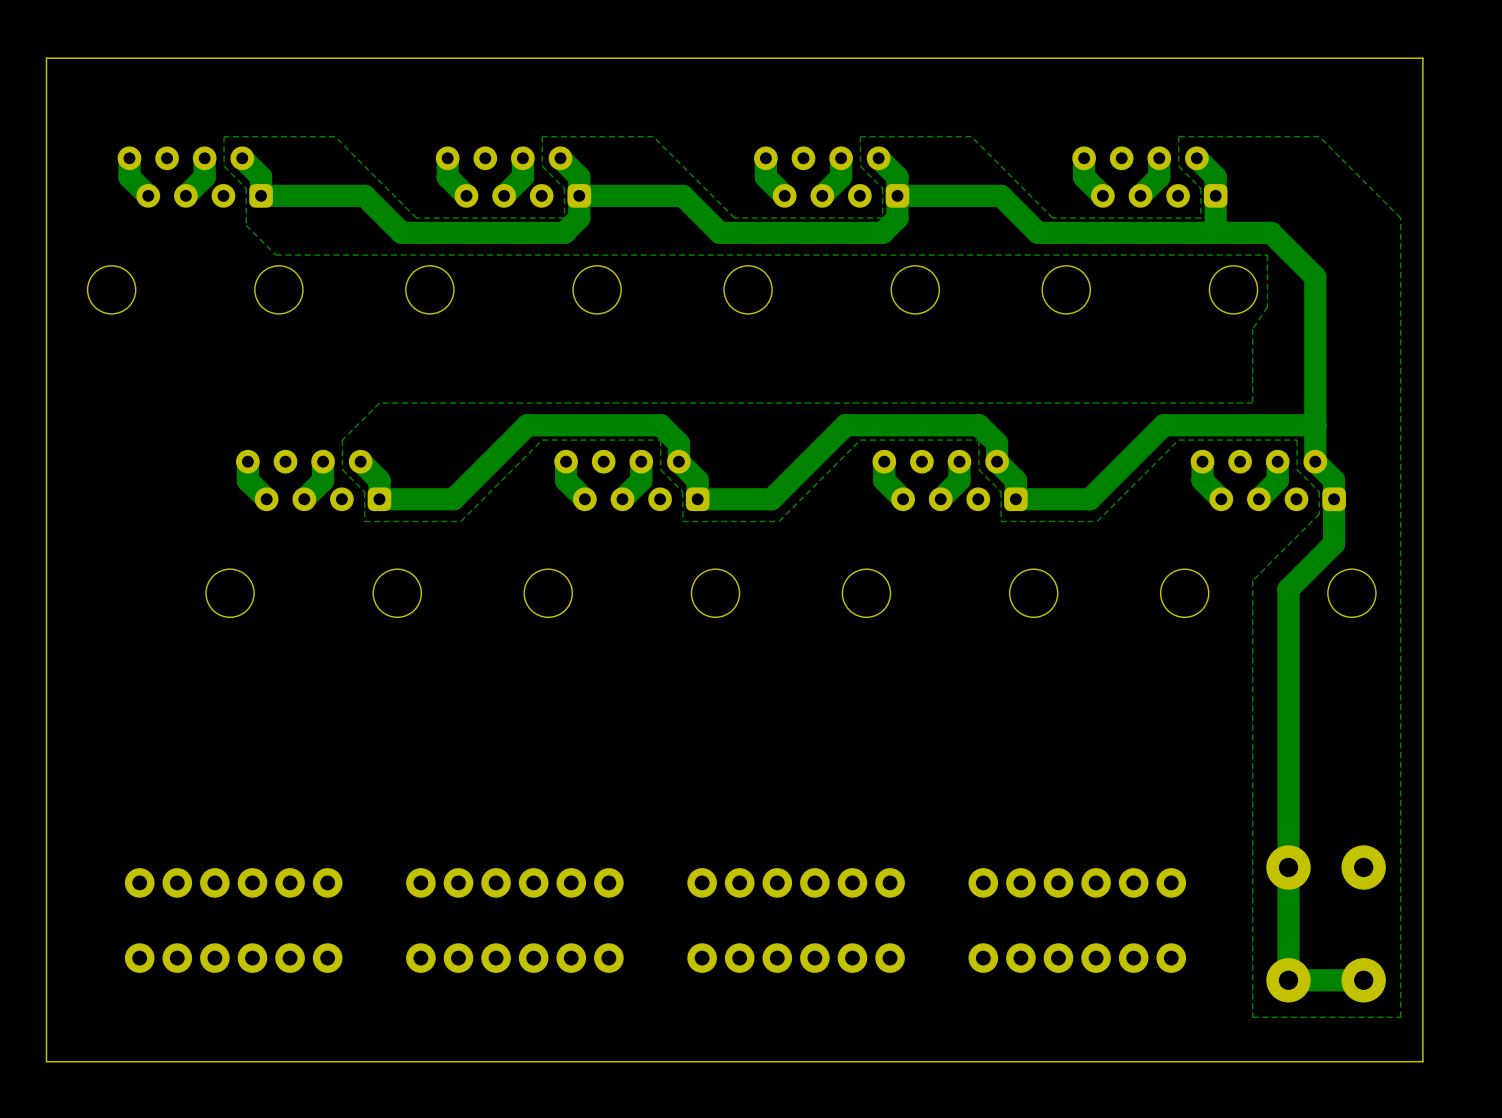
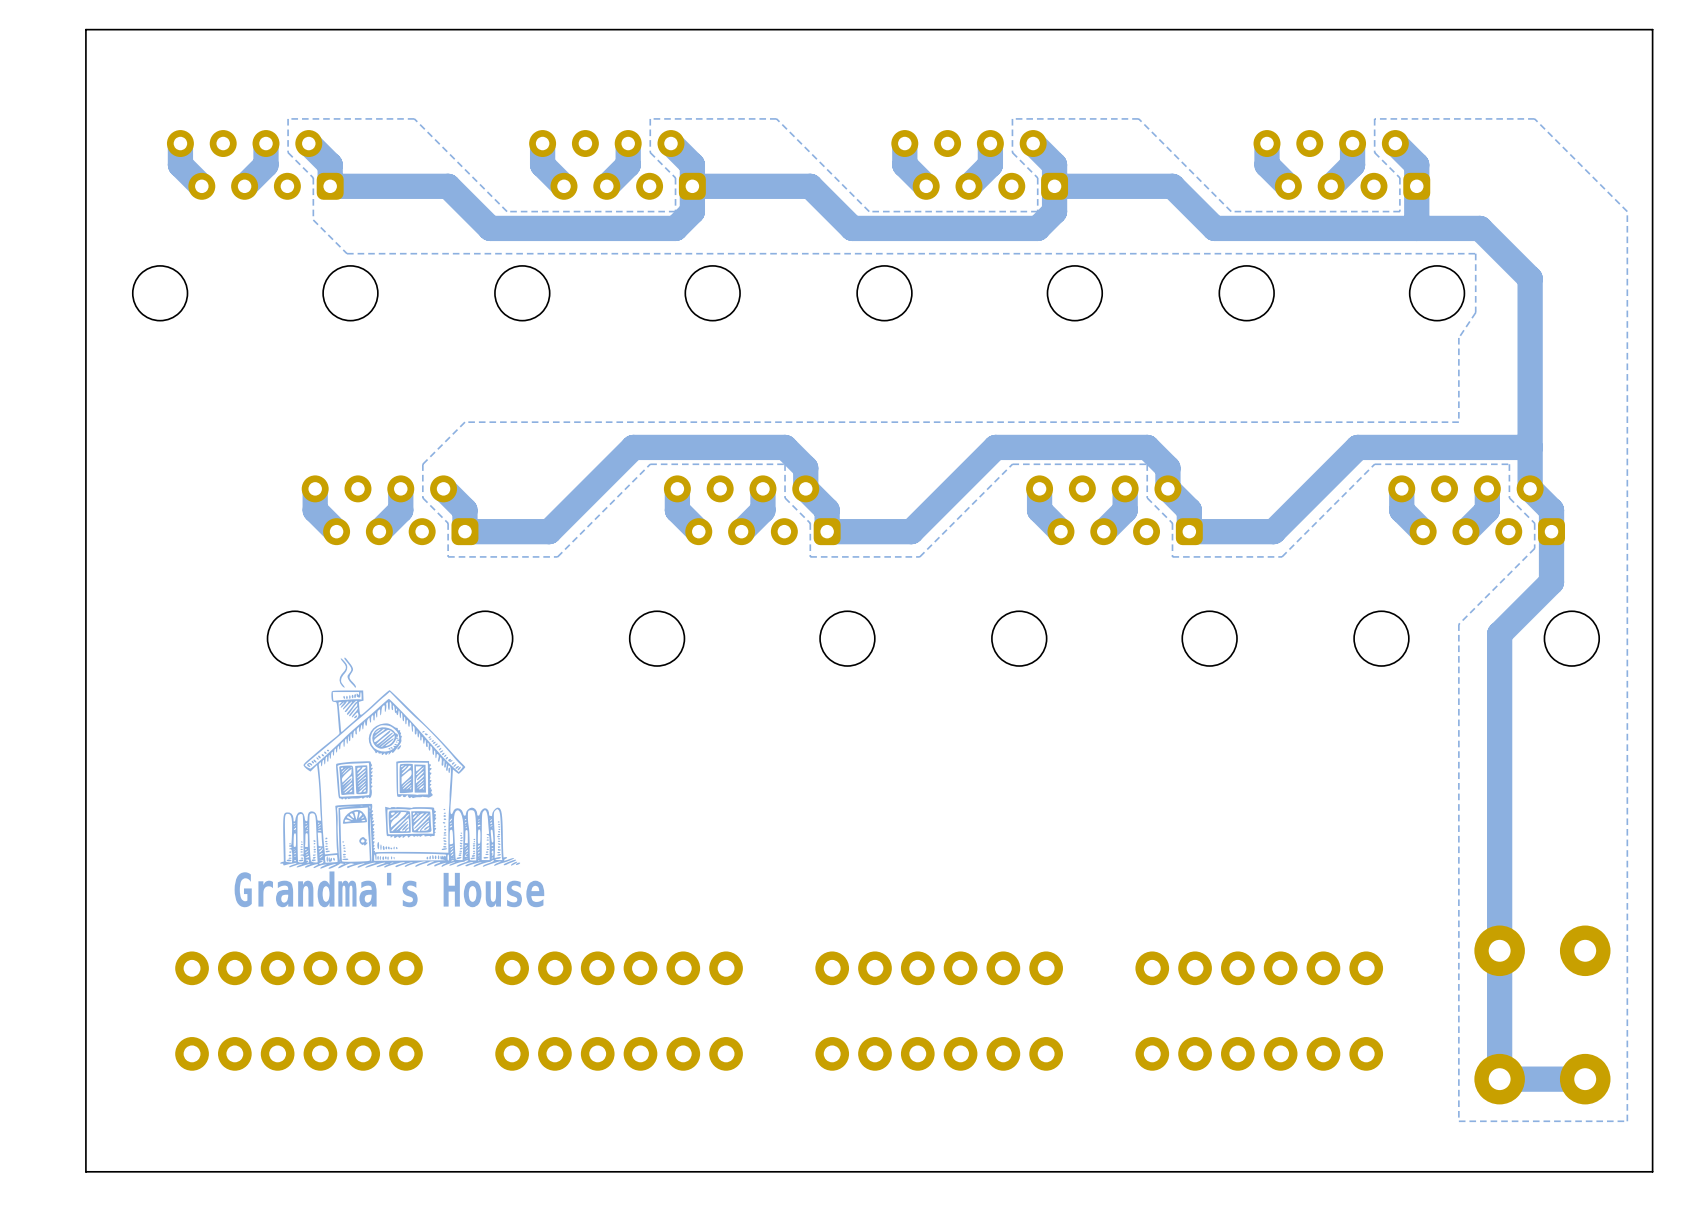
drawing: none -> [280, 657, 521, 869]
text: none -> Grandma's House (389, 889)

